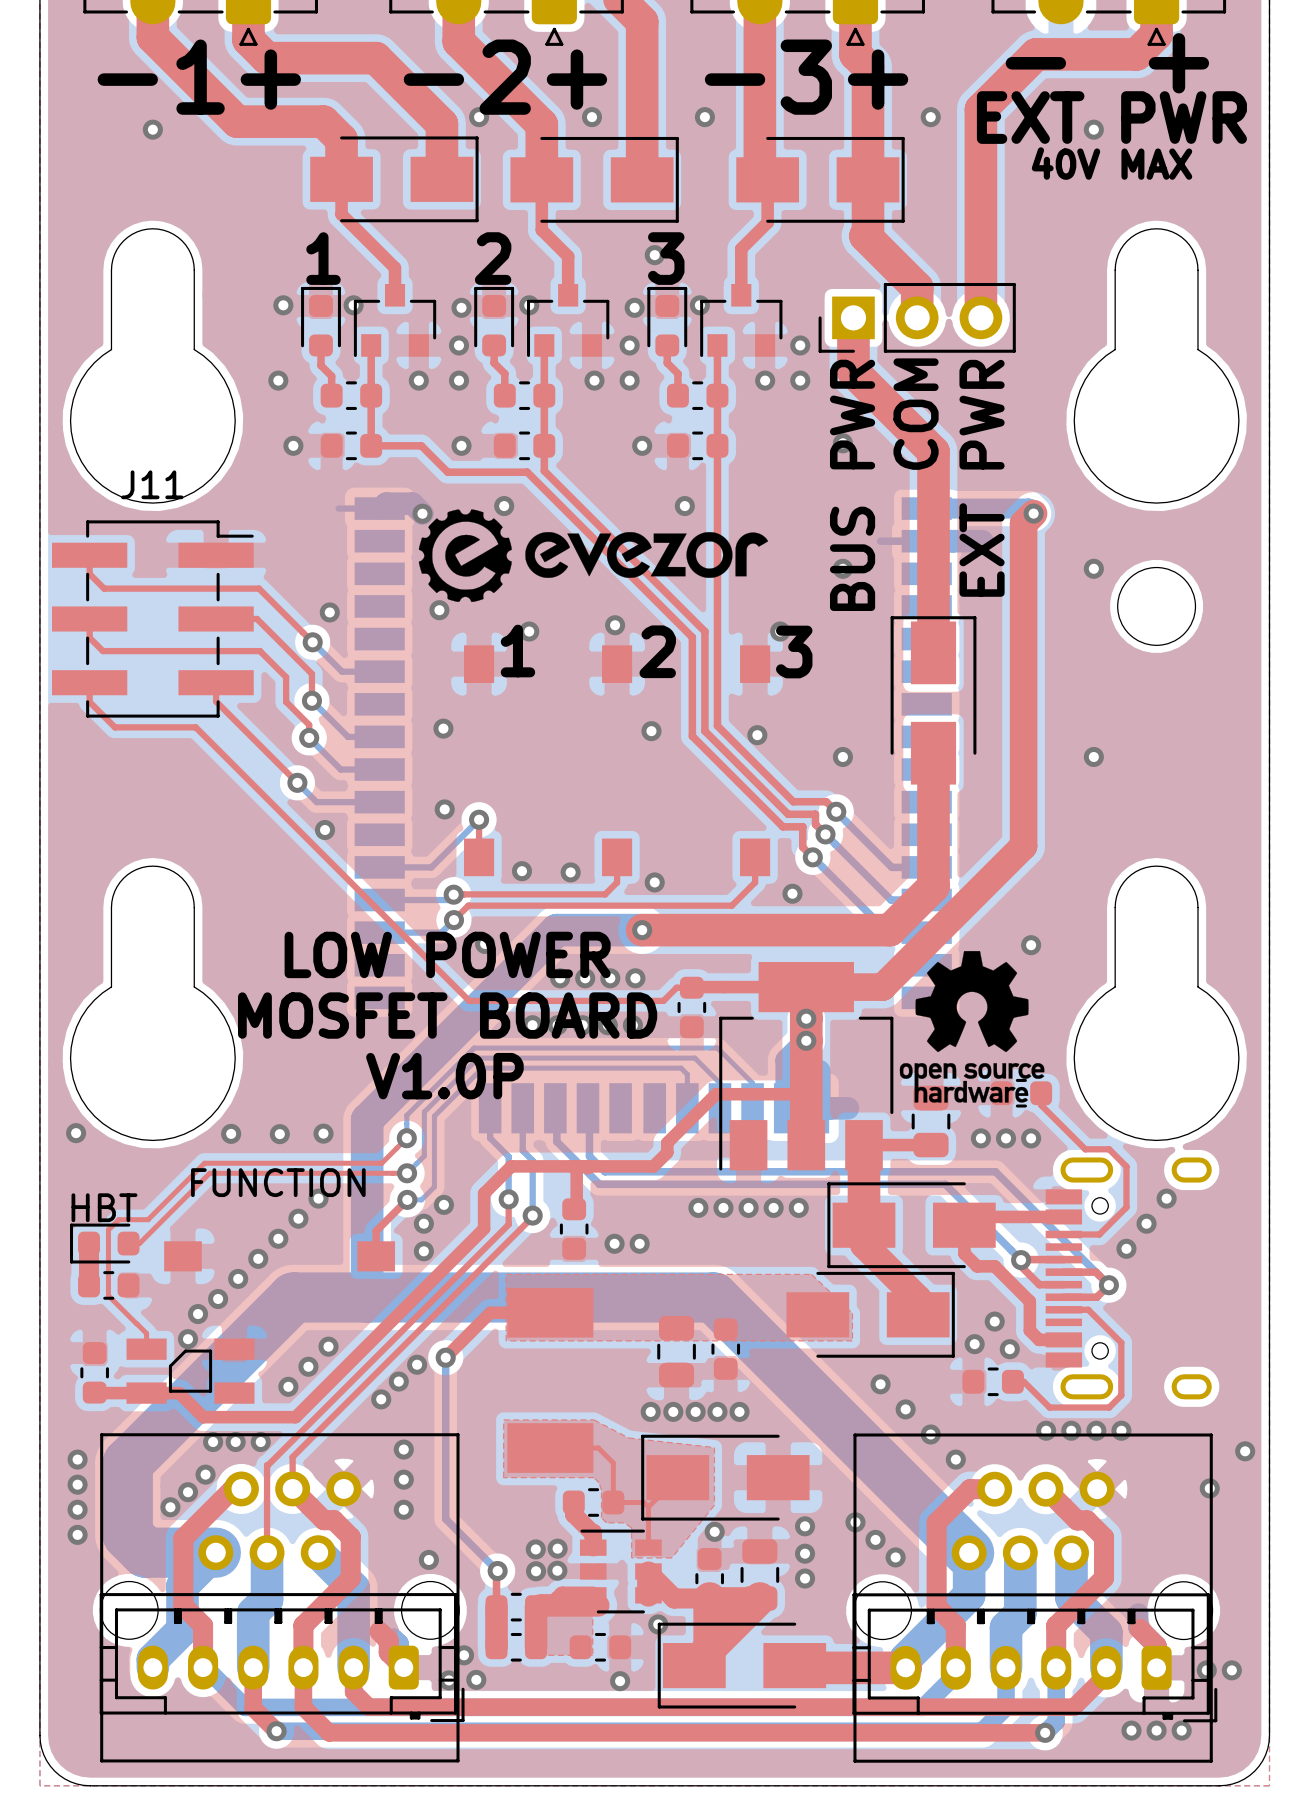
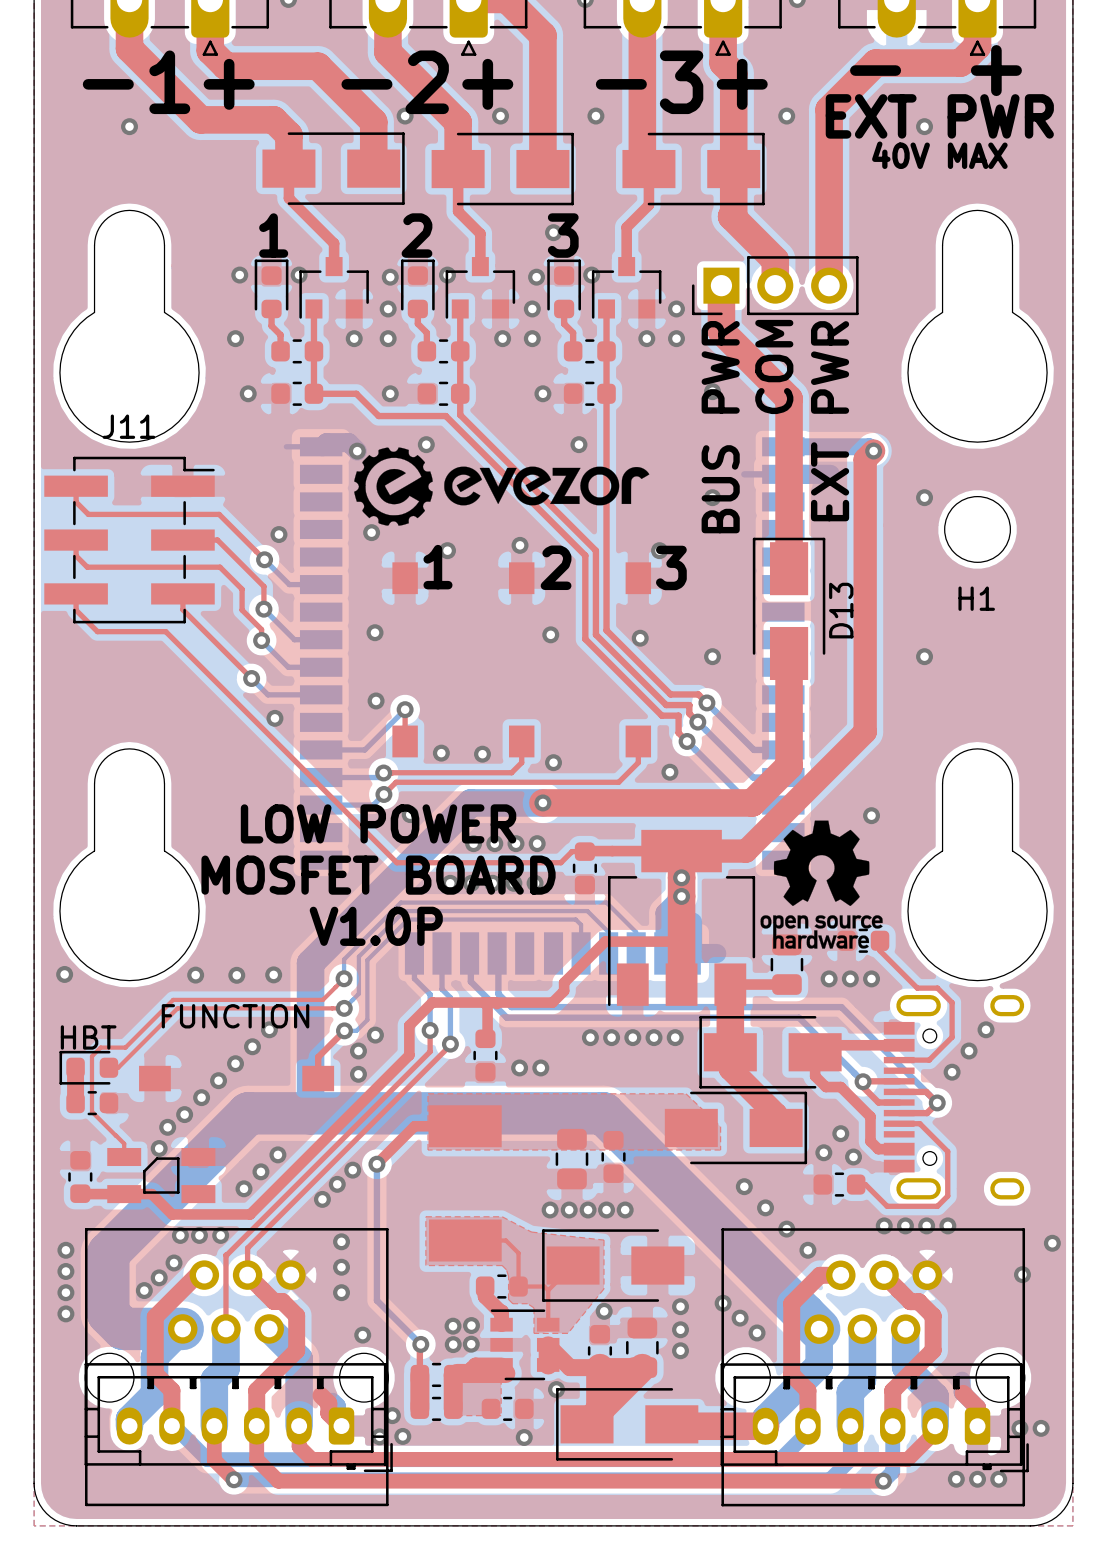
H1 name: none -> H1 (976, 598)
D13 name: none -> D13 (841, 610)

